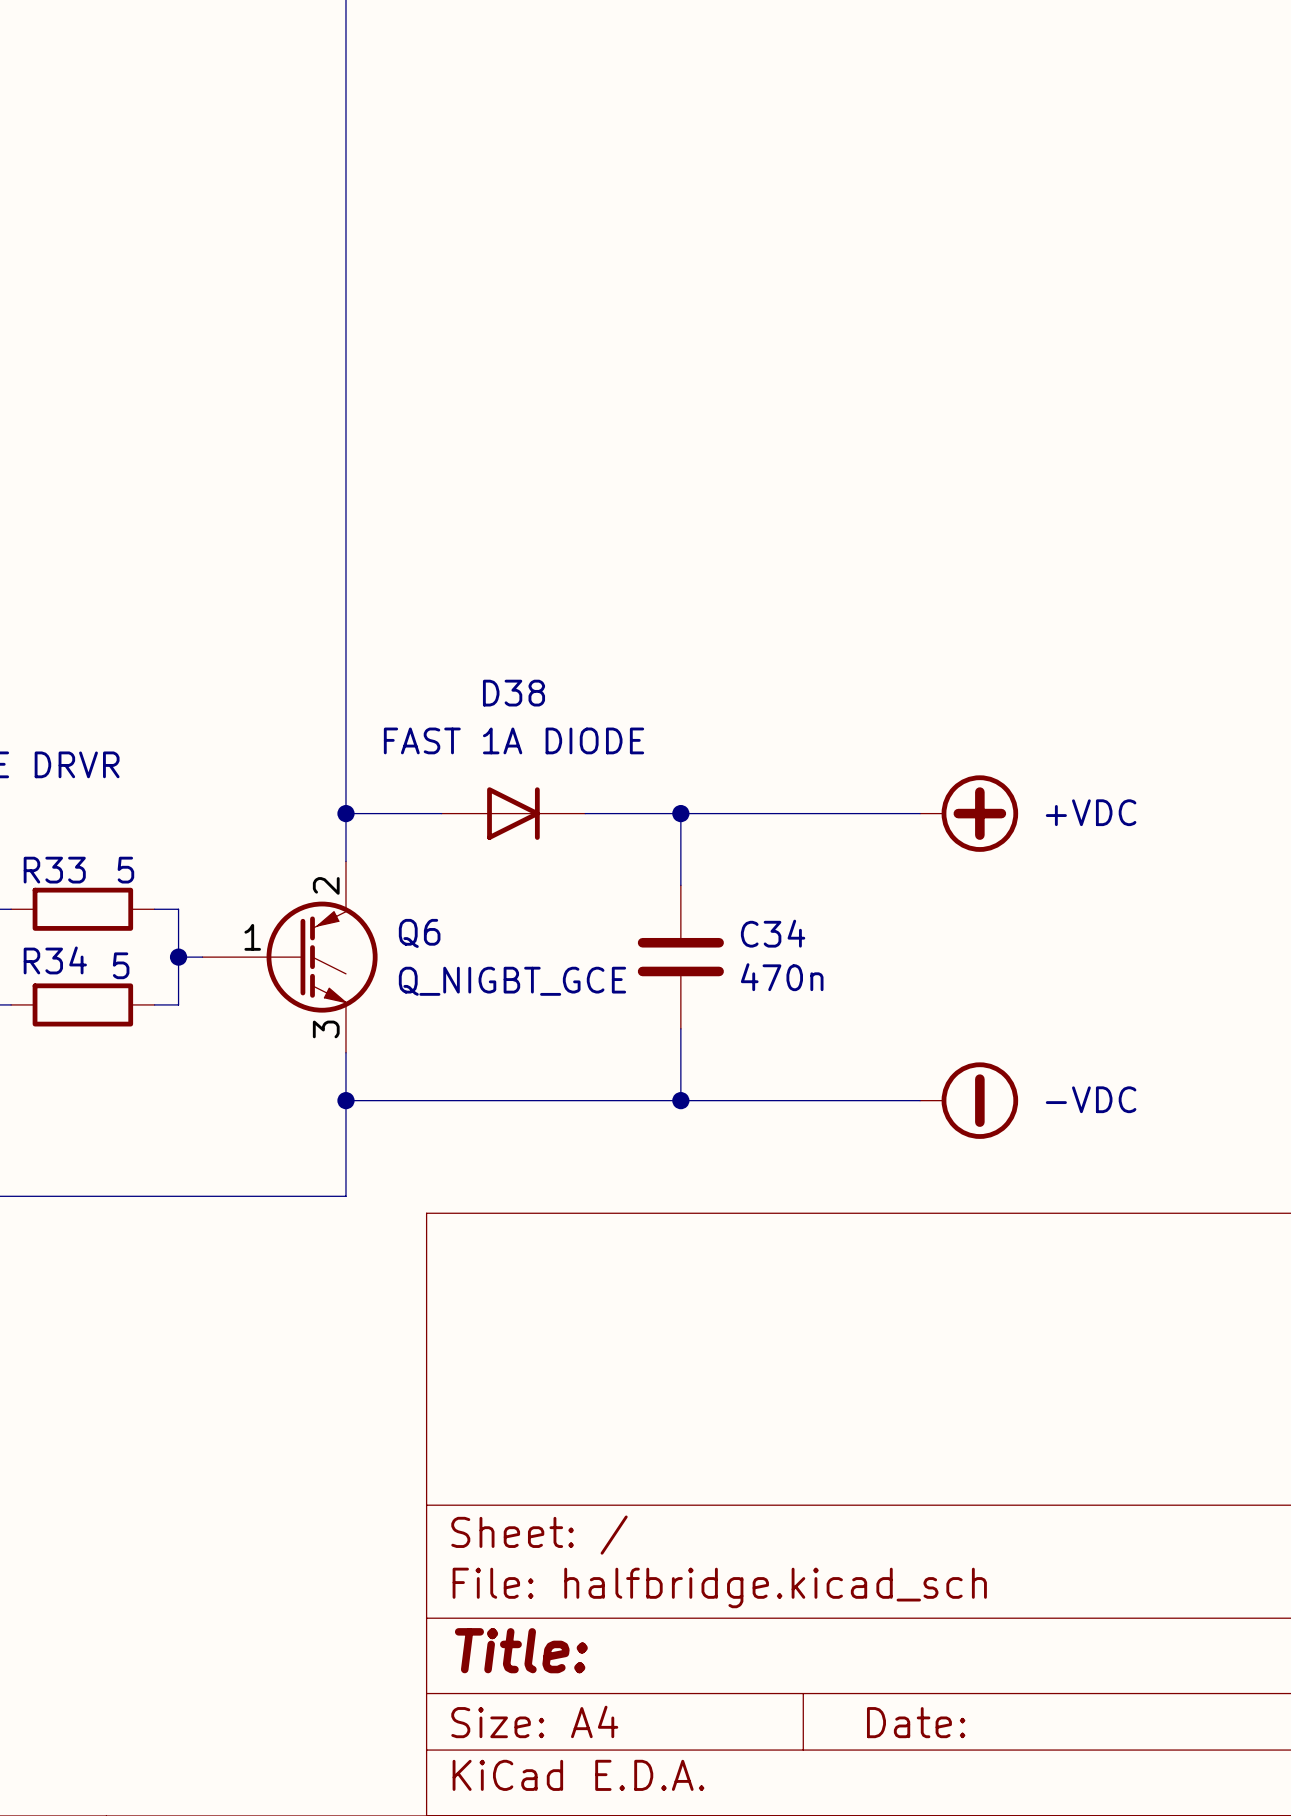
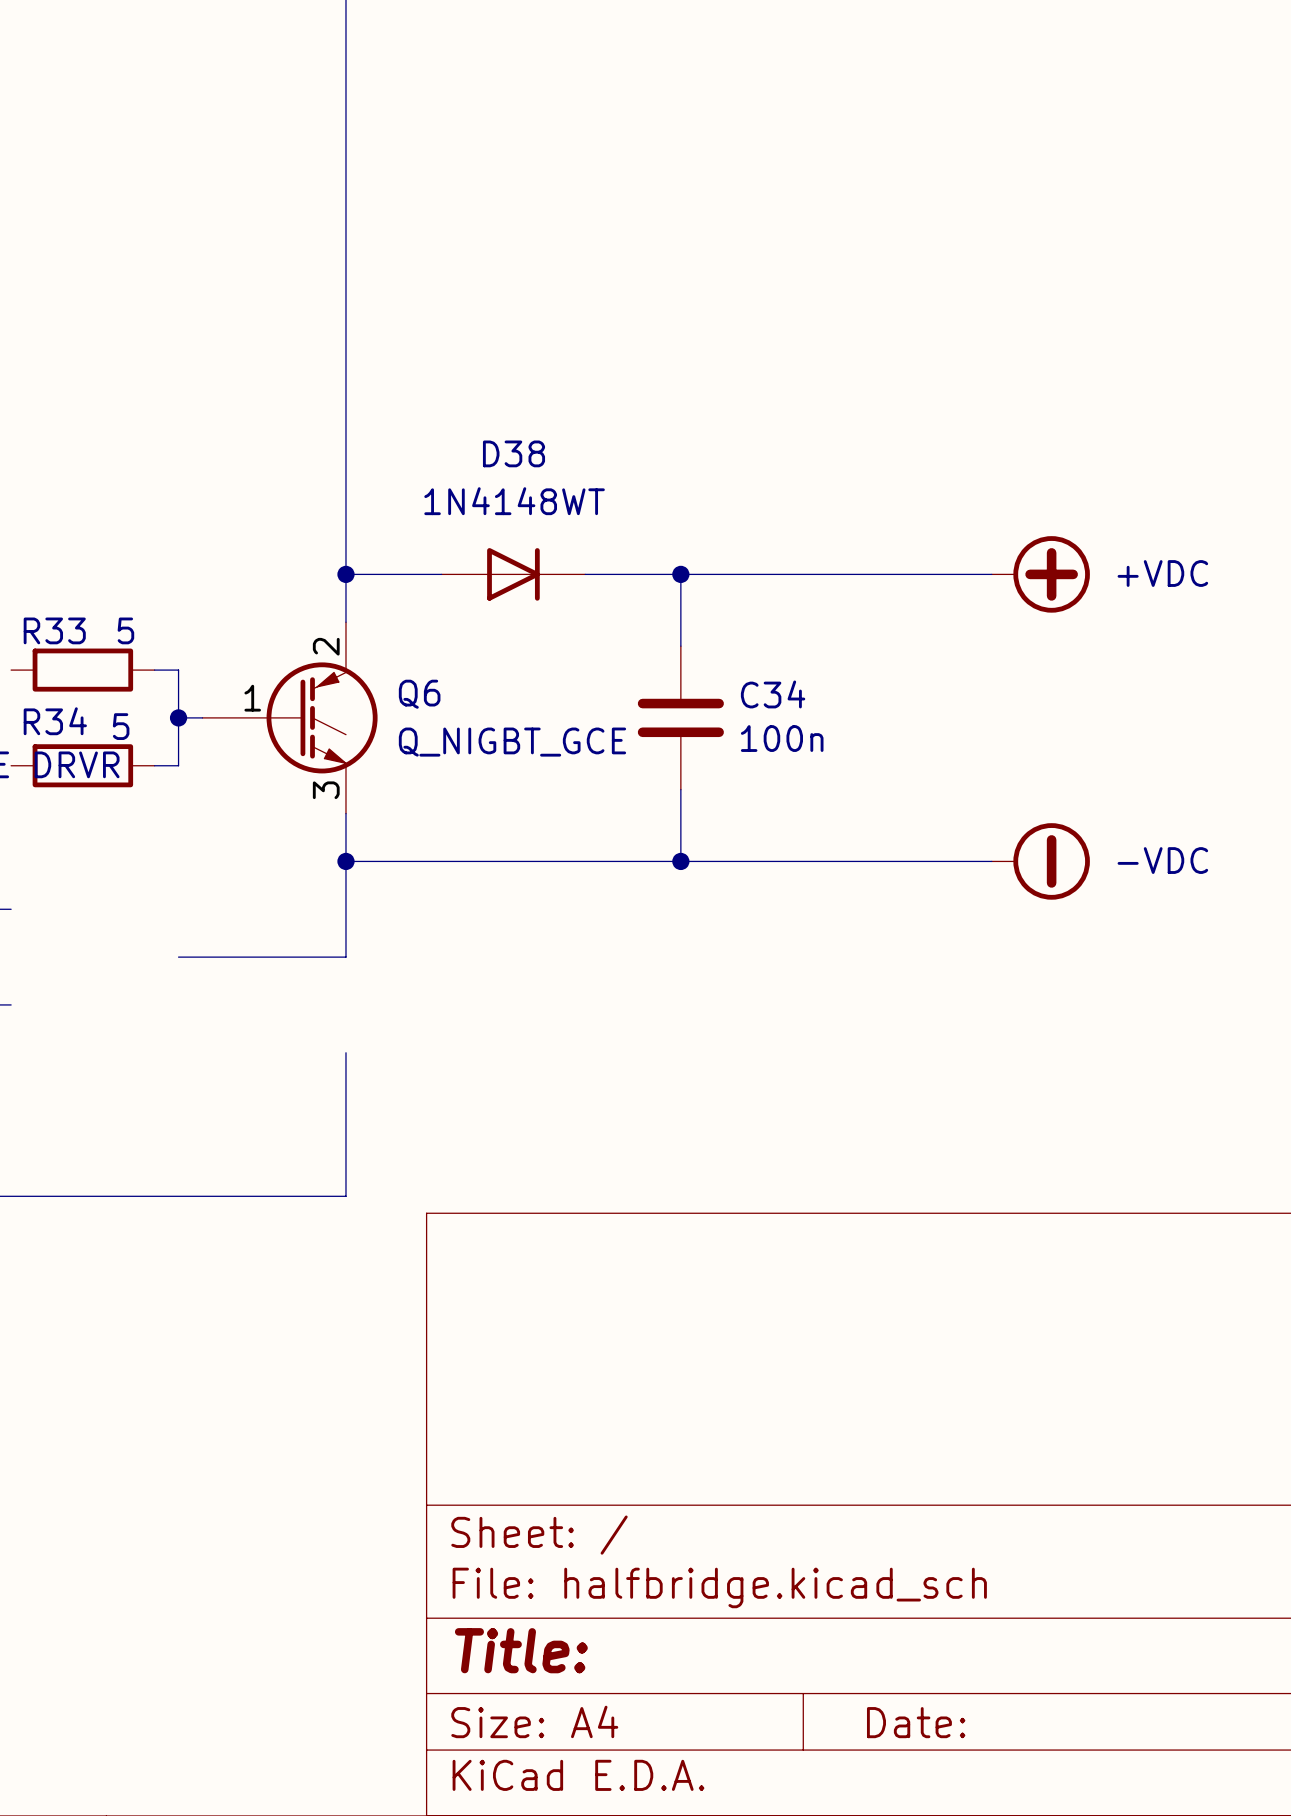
wire: none -> (345, 574) (441, 574)
junction: none -> (345, 574)
wire: none -> (585, 574) (991, 574)
junction: none -> (680, 574)
wire: (345, 622) (345, 813) (441, 813) -> none
wire: none -> (178, 717) (202, 717)
junction: none -> (178, 717)
D38 value: FAST 1A DIODE (514, 740) -> 1N4148WT (514, 501)
junction position: (345, 813) -> (345, 861)
D38 position: (513, 813) -> (513, 574)
wire: (585, 813) (920, 813) -> none
junction position: (680, 813) -> (680, 861)
power symbol position: +VDC (969, 813) -> +VDC (1040, 574)
wire: (680, 861) (680, 885) -> (680, 789) (680, 813)
wire: none -> (991, 861) (345, 861) (345, 957) (202, 957)
R33 position: (82, 909) -> (82, 670)
wire: (154, 909) (178, 909) (178, 1004) (154, 1004) -> (154, 670) (178, 670) (178, 765) (154, 765)
junction: (178, 957) -> none
Q6 position: (290, 957) -> (290, 717)
C34 position: (680, 957) -> (680, 717)
C34 value: 470n (782, 977) -> 100n (782, 738)
R34 position: (82, 1004) -> (82, 765)
wire: (680, 1028) (680, 1100) -> (680, 574) (680, 646)
wire: (345, 1100) (920, 1100) -> none
junction: (345, 1100) -> none
junction: (680, 1100) -> none
power symbol position: -VDC (969, 1100) -> -VDC (1040, 861)

